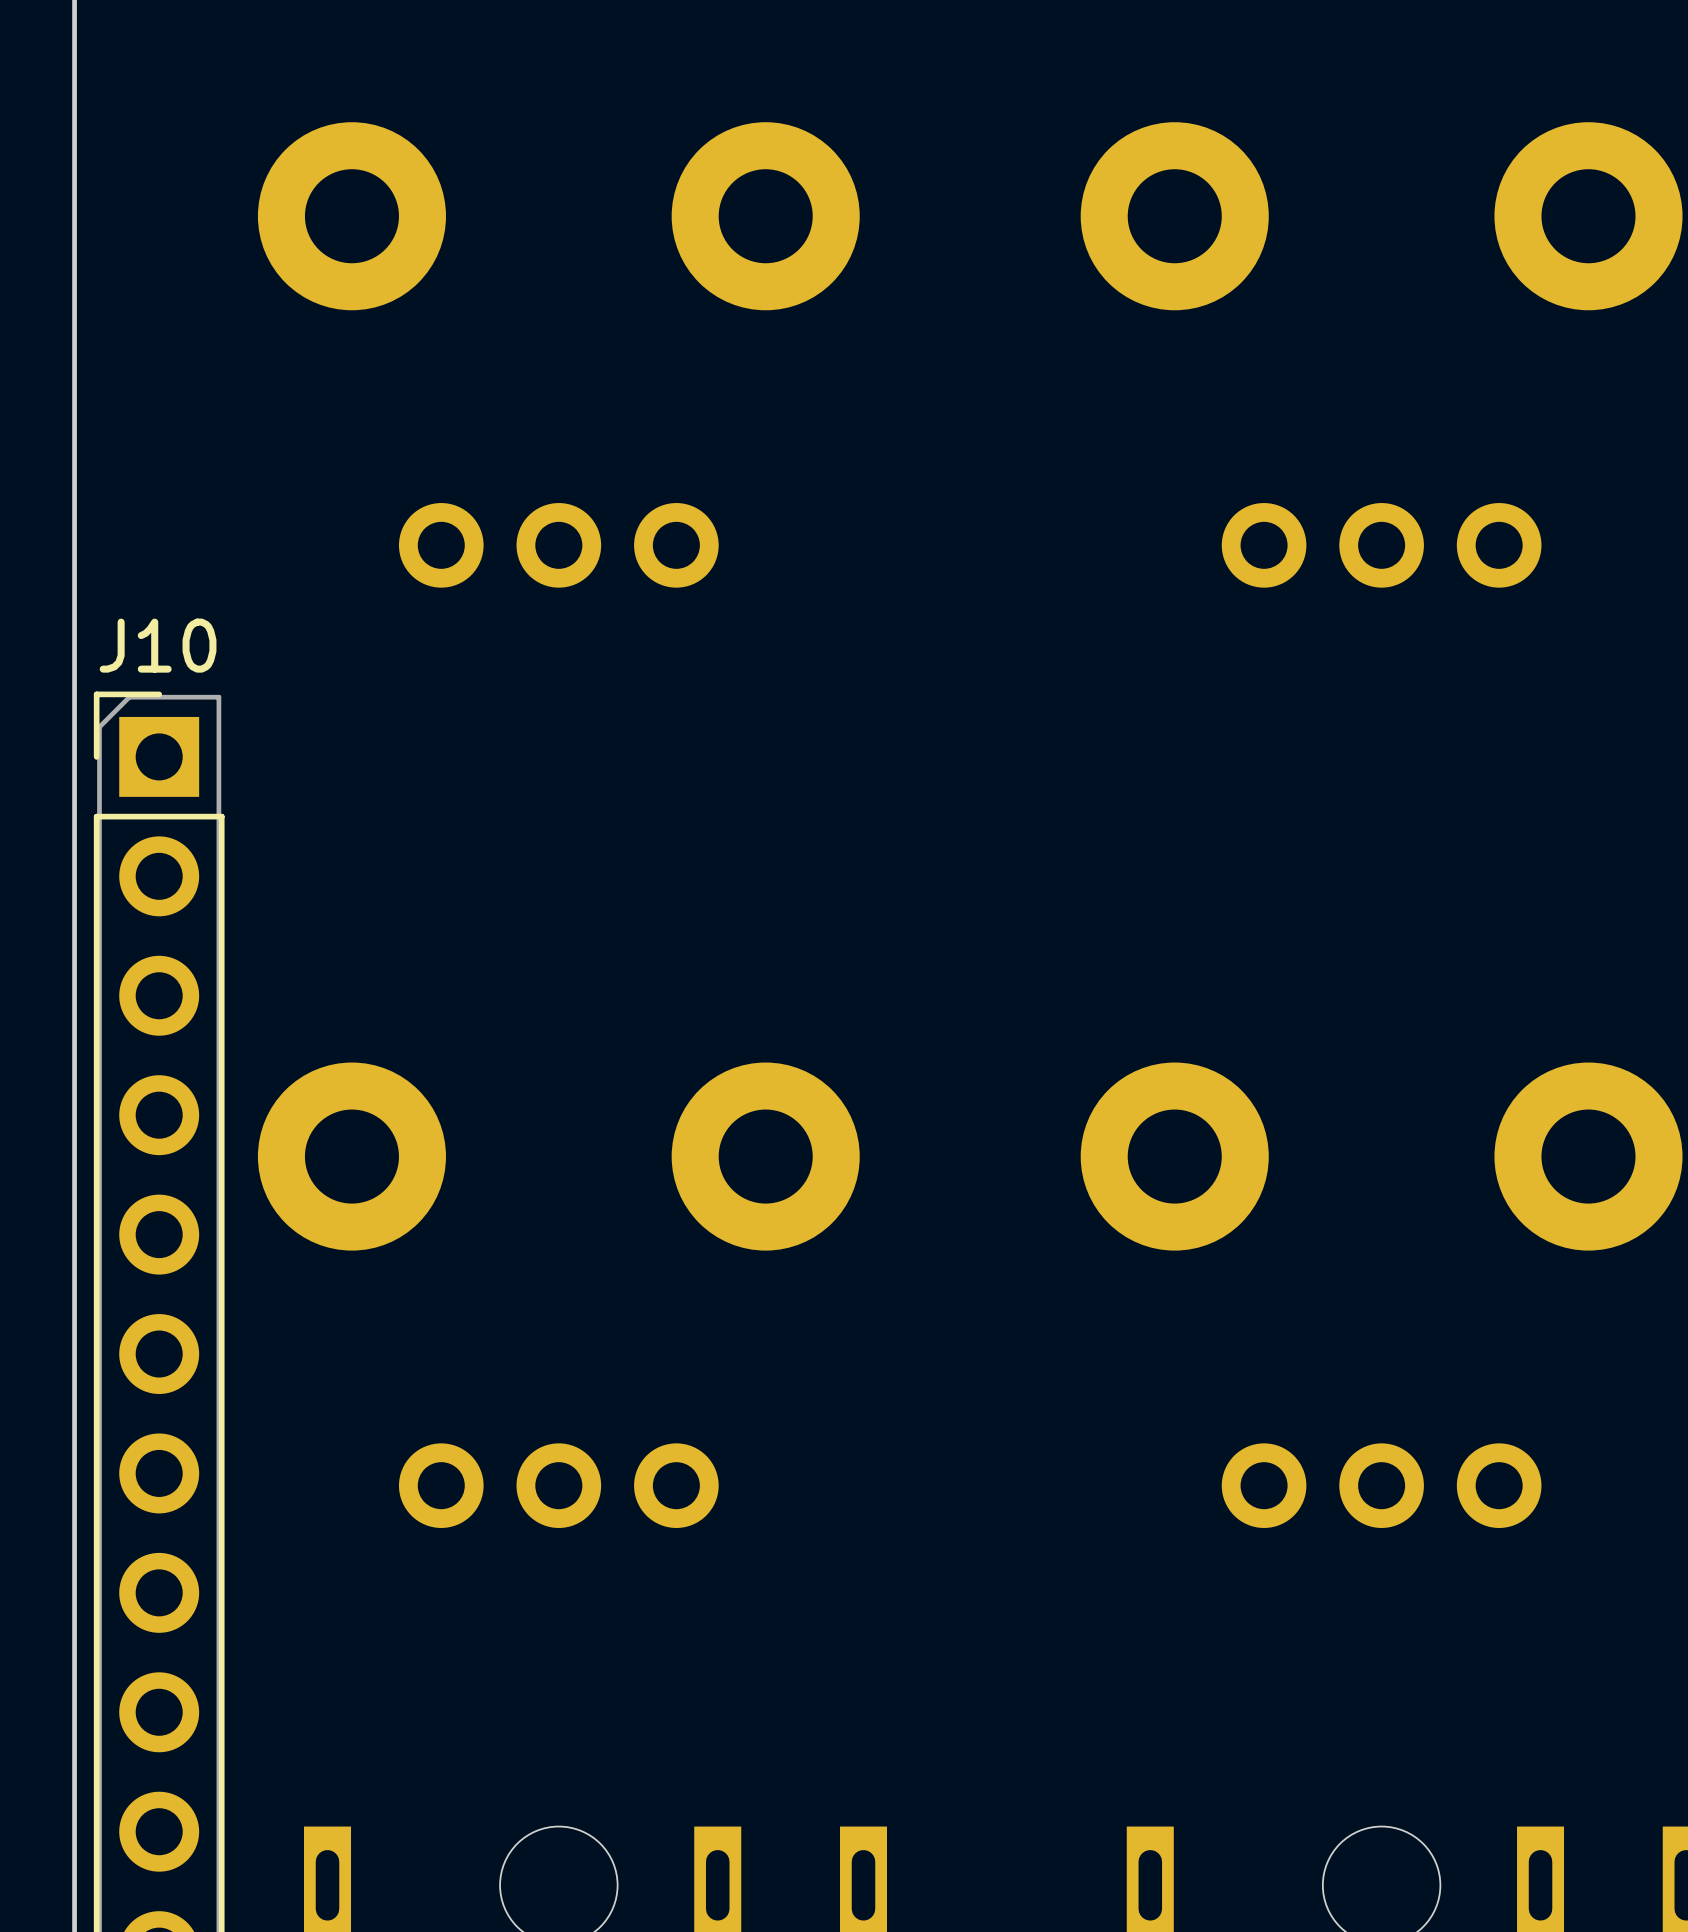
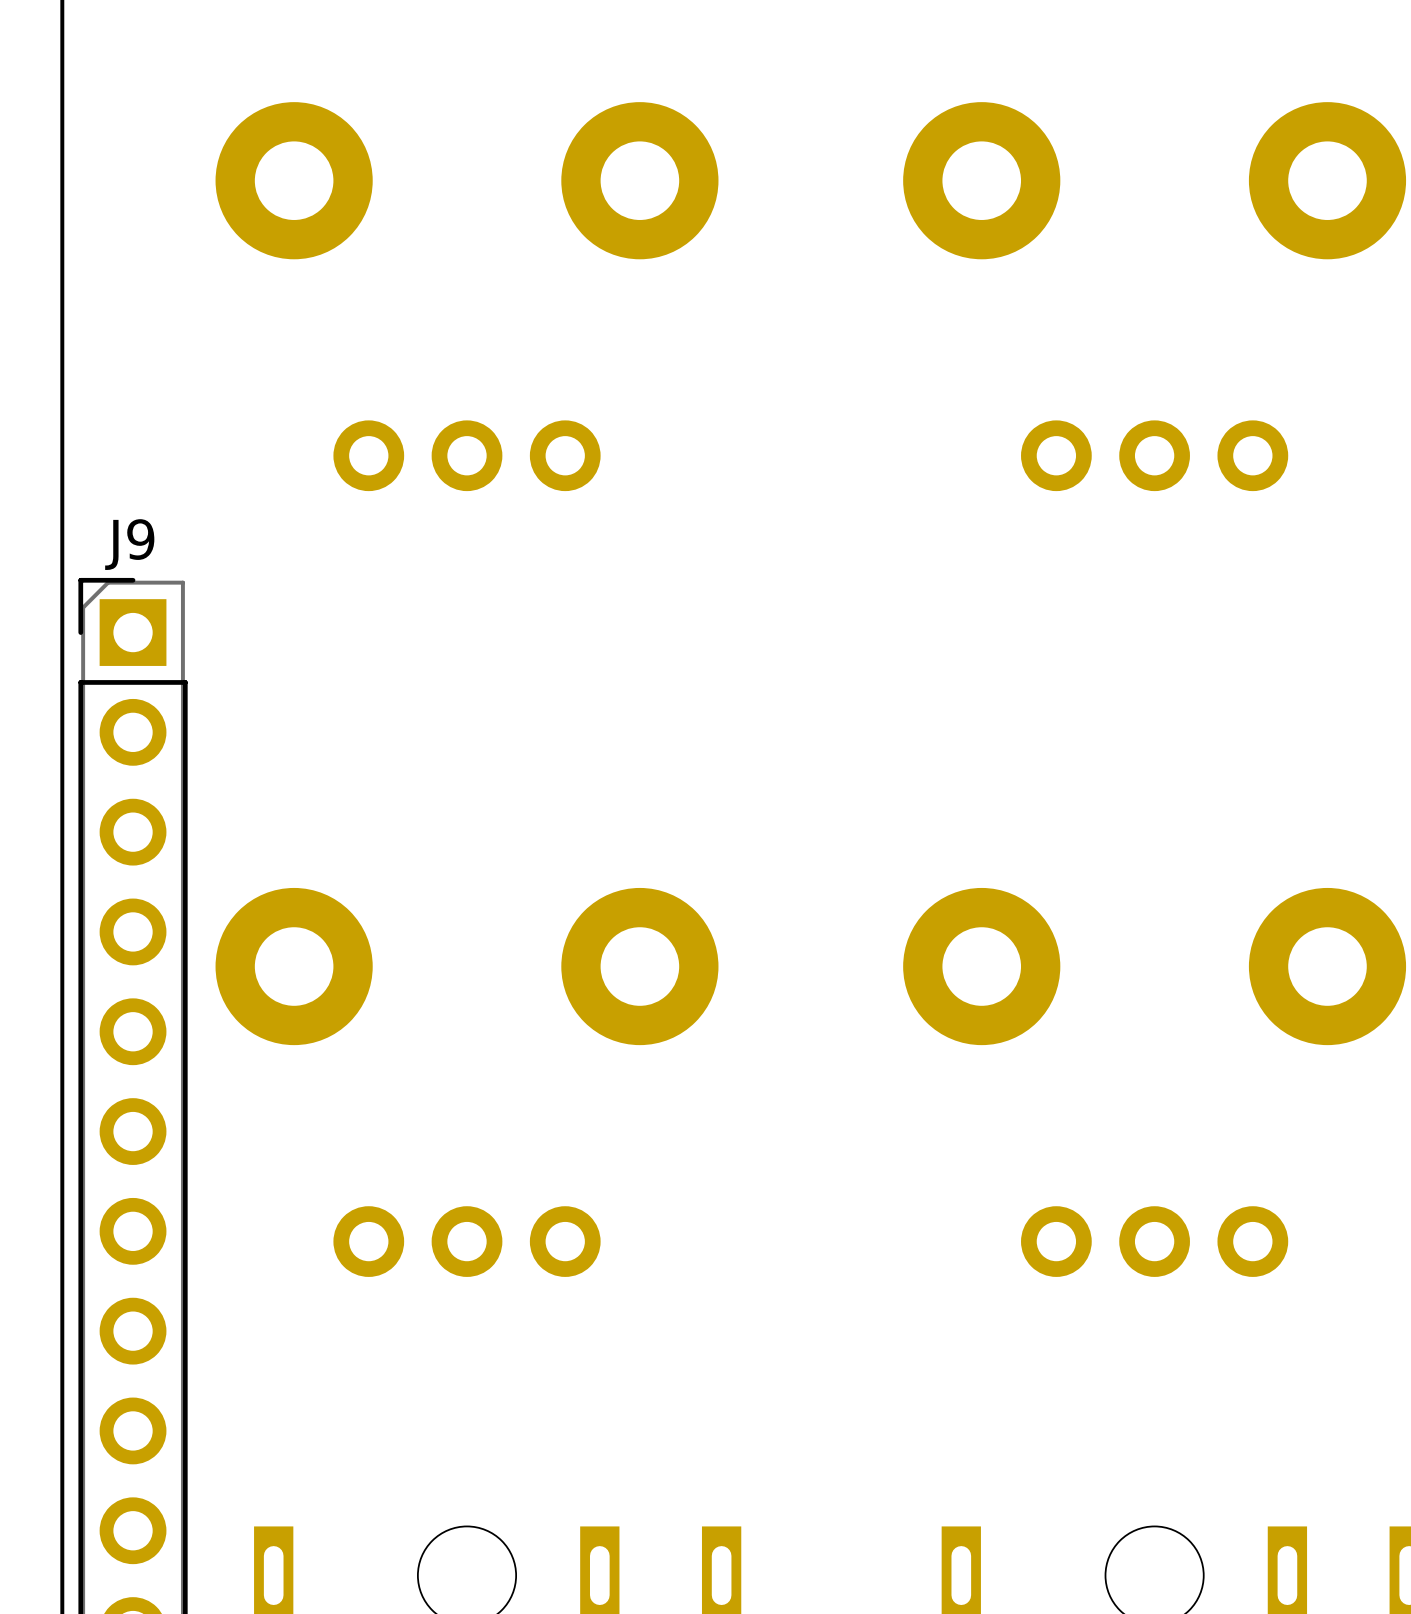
J10 name: J10 (158, 645) -> J9 (129, 544)

